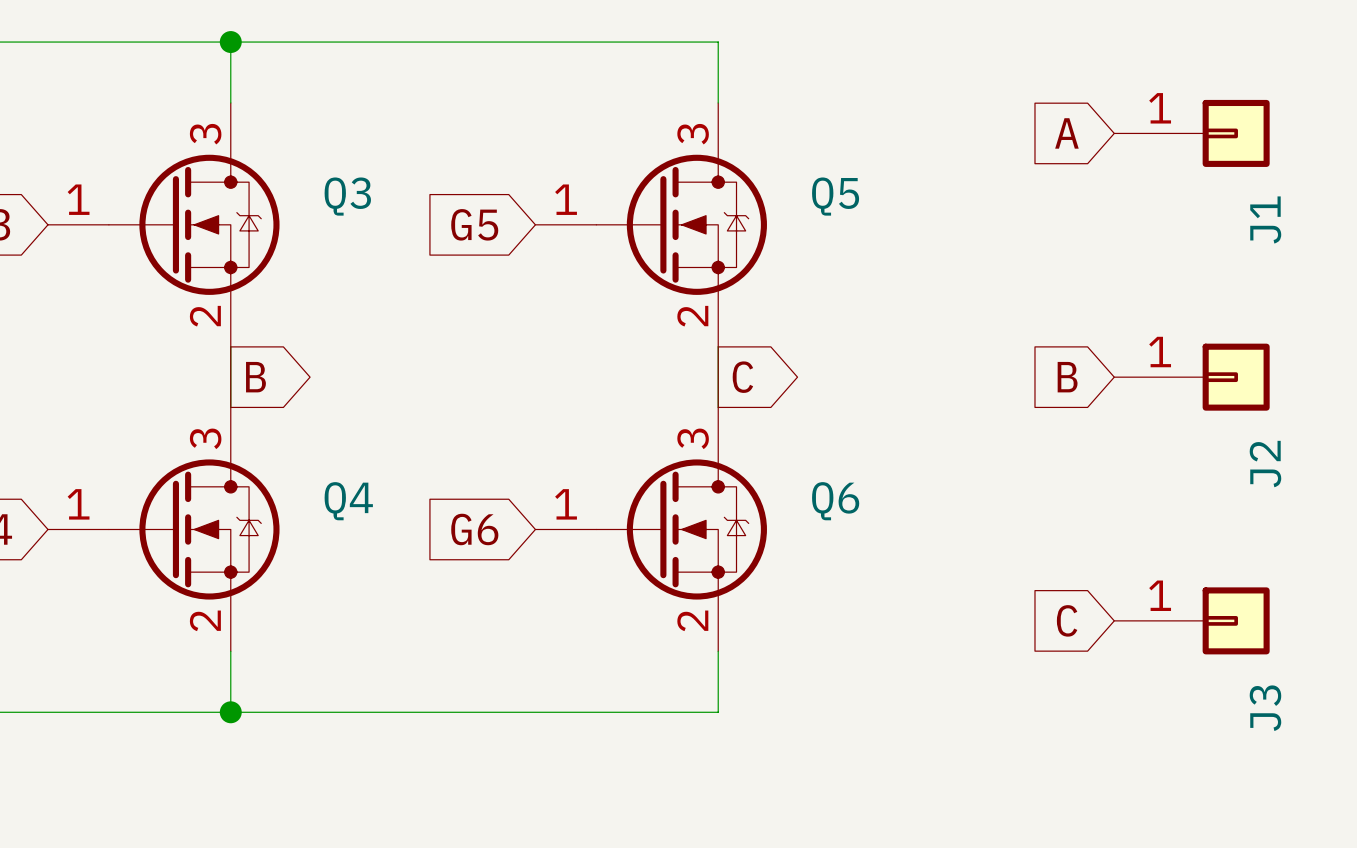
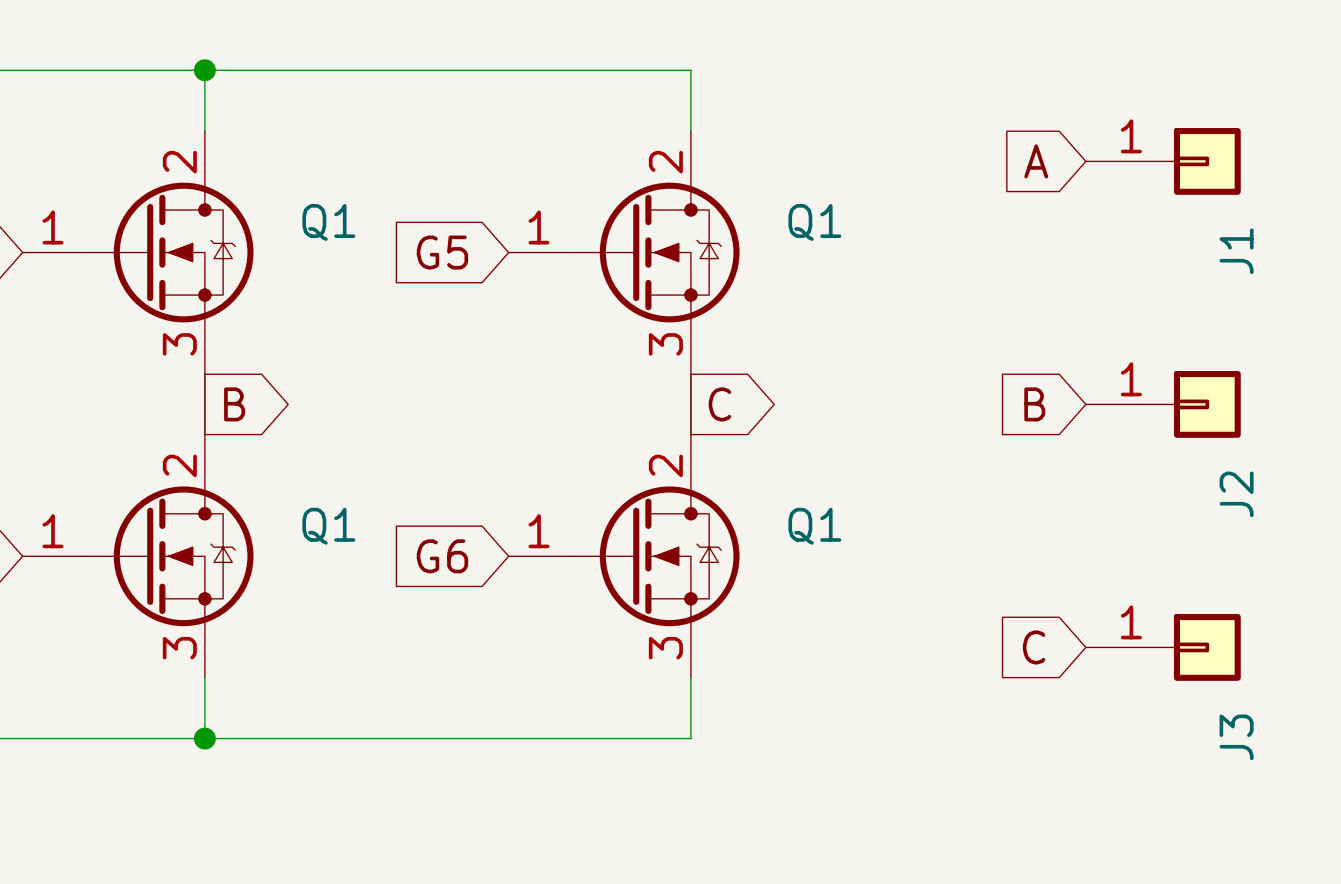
Q3 pin number: 3 (205, 134) -> 2 (179, 162)
Q5 pin number: 3 (693, 134) -> 2 (665, 162)
Q3 name: Q3 (347, 196) -> Q1 (328, 222)
Q5 name: Q5 (835, 196) -> Q1 (814, 222)
Q3 pin number: 2 (205, 316) -> 3 (179, 344)
Q5 pin number: 2 (692, 316) -> 3 (665, 344)
Q4 pin number: 3 (205, 438) -> 2 (179, 465)
Q6 pin number: 3 (693, 438) -> 2 (665, 465)
Q4 name: Q4 (348, 501) -> Q1 (328, 526)
Q6 name: Q6 (835, 501) -> Q1 (814, 526)
Q4 pin number: 2 (205, 620) -> 3 (179, 648)
Q6 pin number: 2 (692, 620) -> 3 (665, 648)

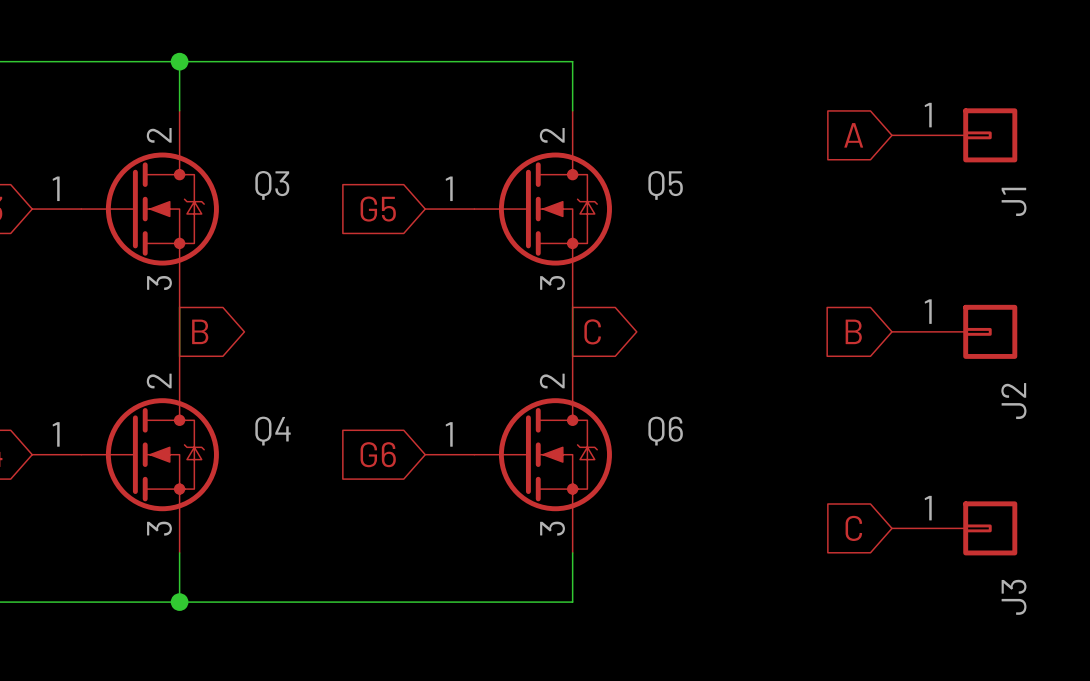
Q1 name: Q1 (328, 222) -> Q3 (272, 185)
Q1 name: Q1 (814, 222) -> Q5 (665, 185)
Q1 name: Q1 (328, 526) -> Q4 (273, 431)
Q1 name: Q1 (814, 526) -> Q6 (665, 431)

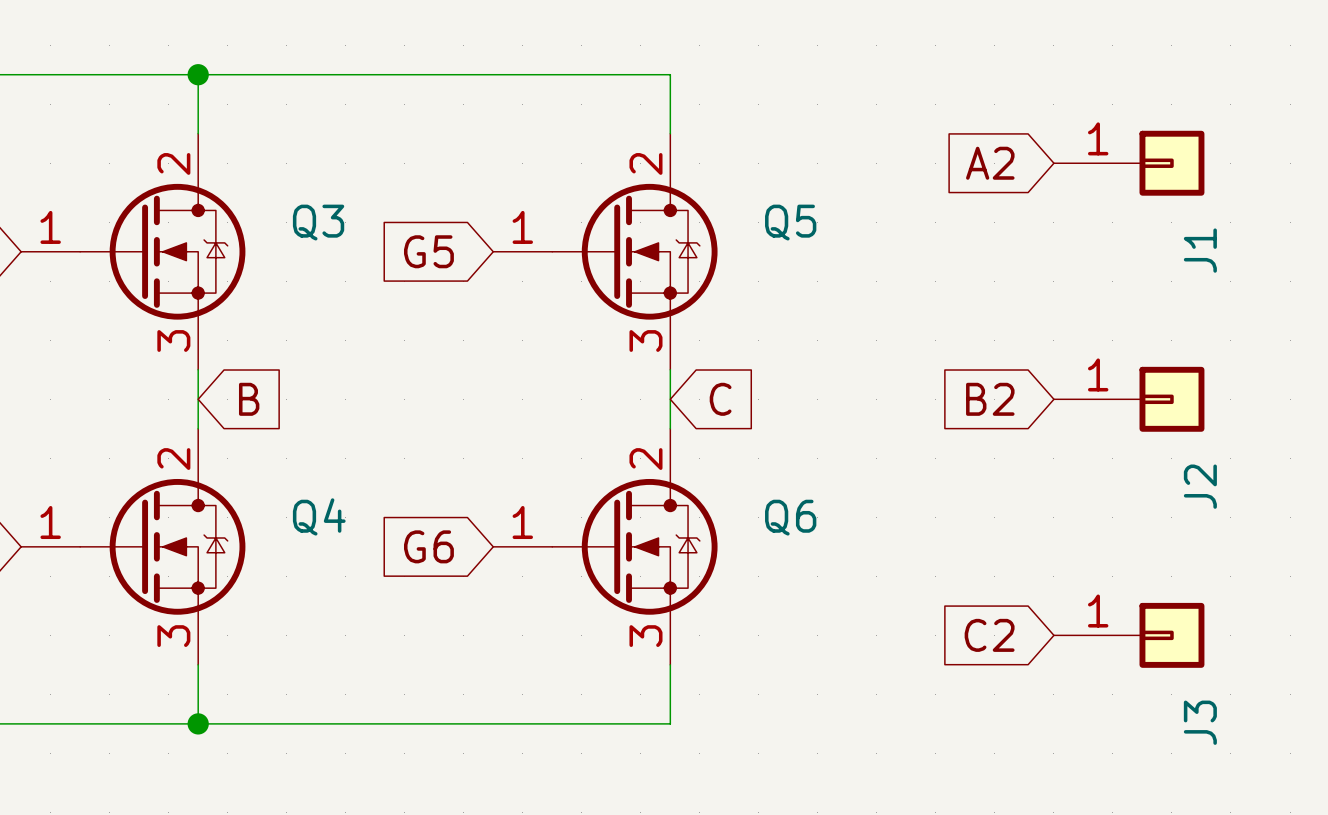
global label: A (853, 135) -> A2 (990, 163)
global label shape: output (200, 331) -> input (249, 399)
global label shape: output (592, 331) -> input (720, 399)
global label: B (853, 331) -> B2 (990, 399)
global label: C (853, 528) -> C2 (989, 635)

